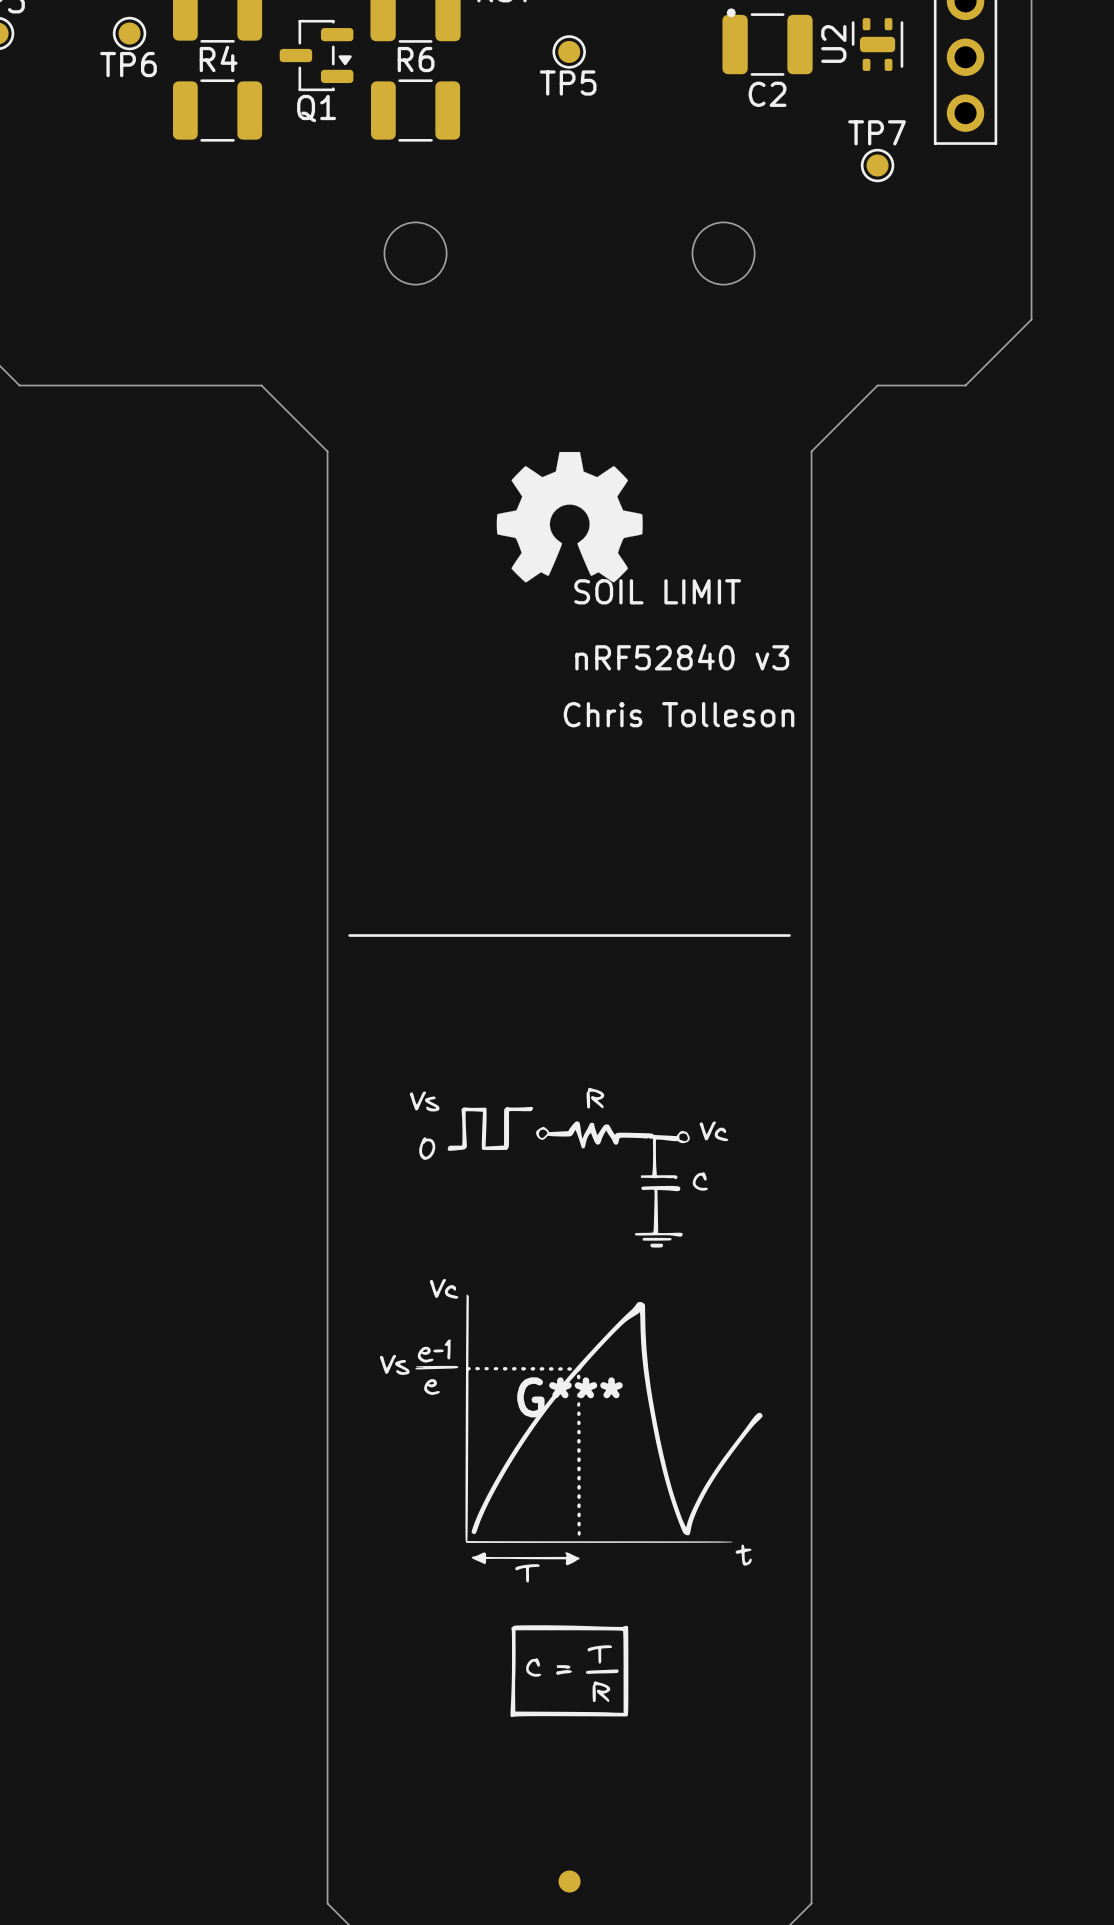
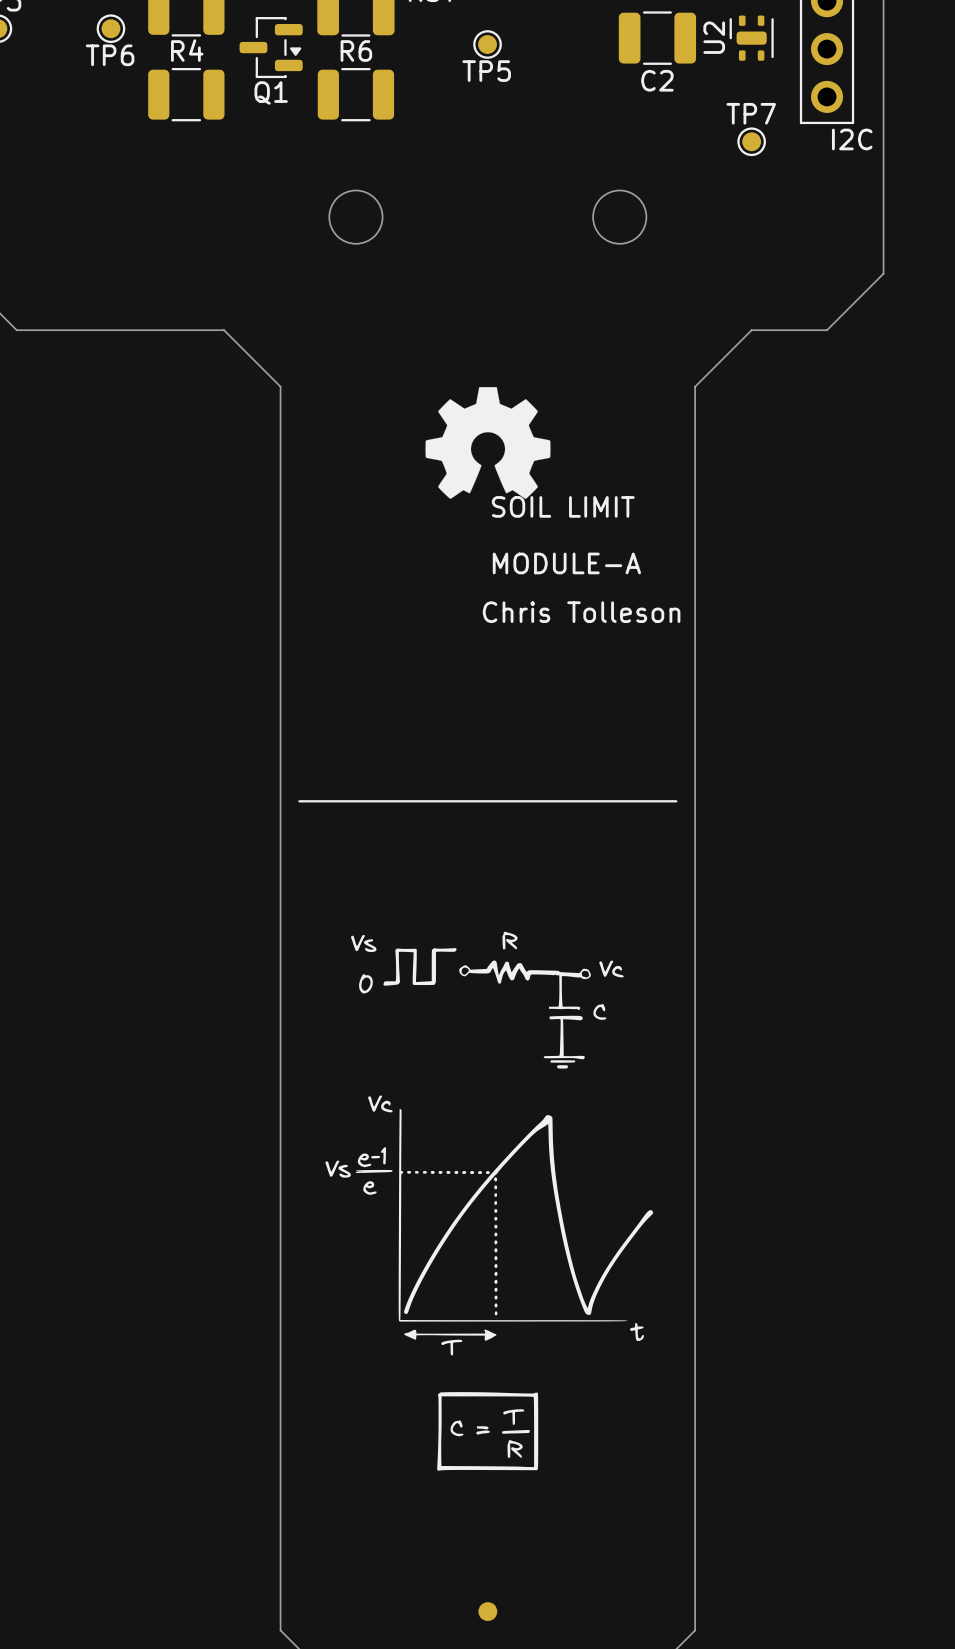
drawing: [726, 8, 736, 18] -> none
text: none -> I2C (852, 139)
text: nRF52840 v3 (682, 657) -> MODULE-A (566, 563)
drawing: none -> [325, 931, 654, 1471]
G***: (571, 1402) -> none

